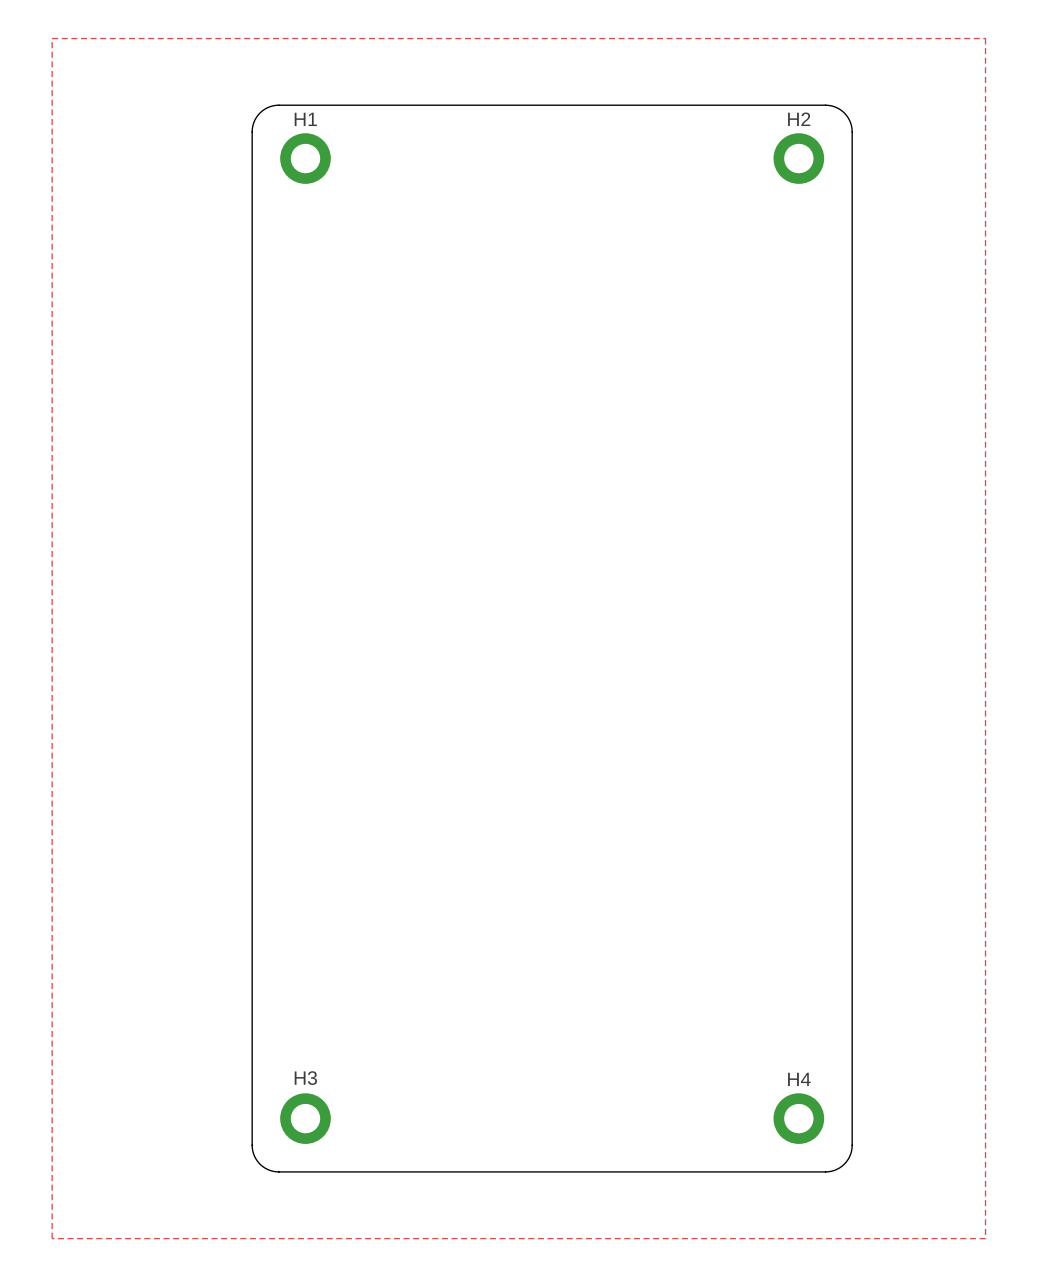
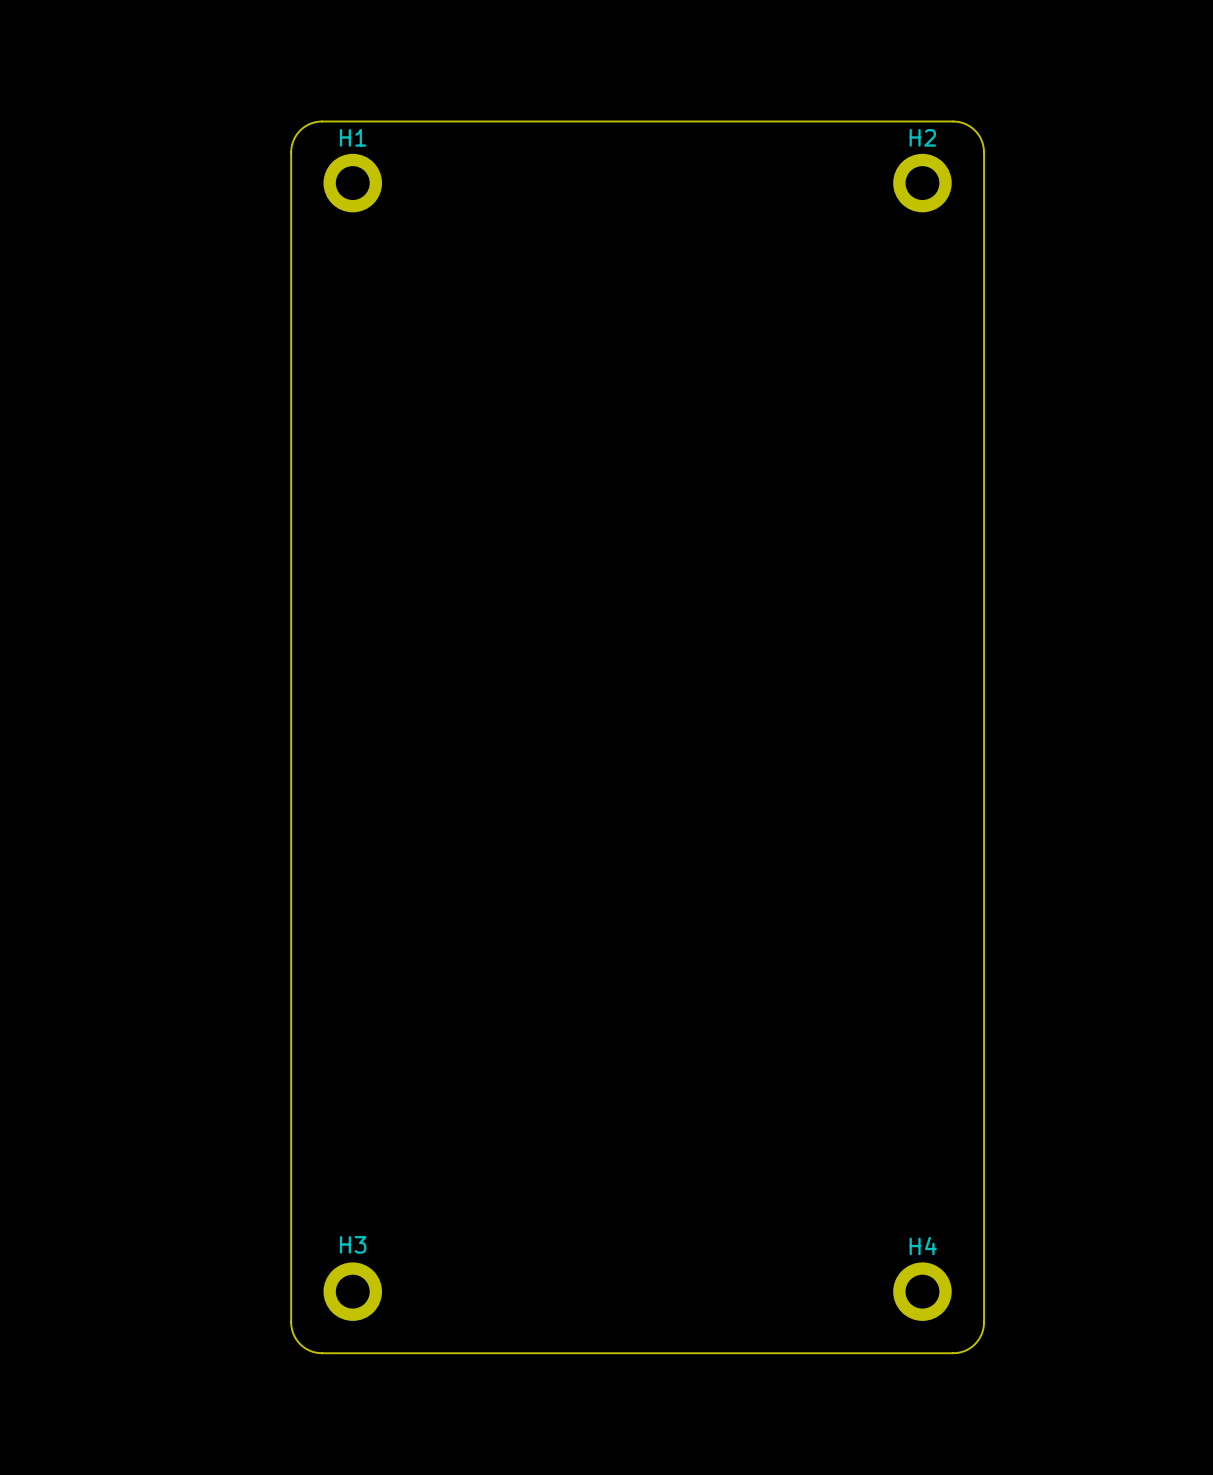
zone outline: (52, 38) (985, 38) (985, 1238) (52, 1238) (52, 38) -> none

